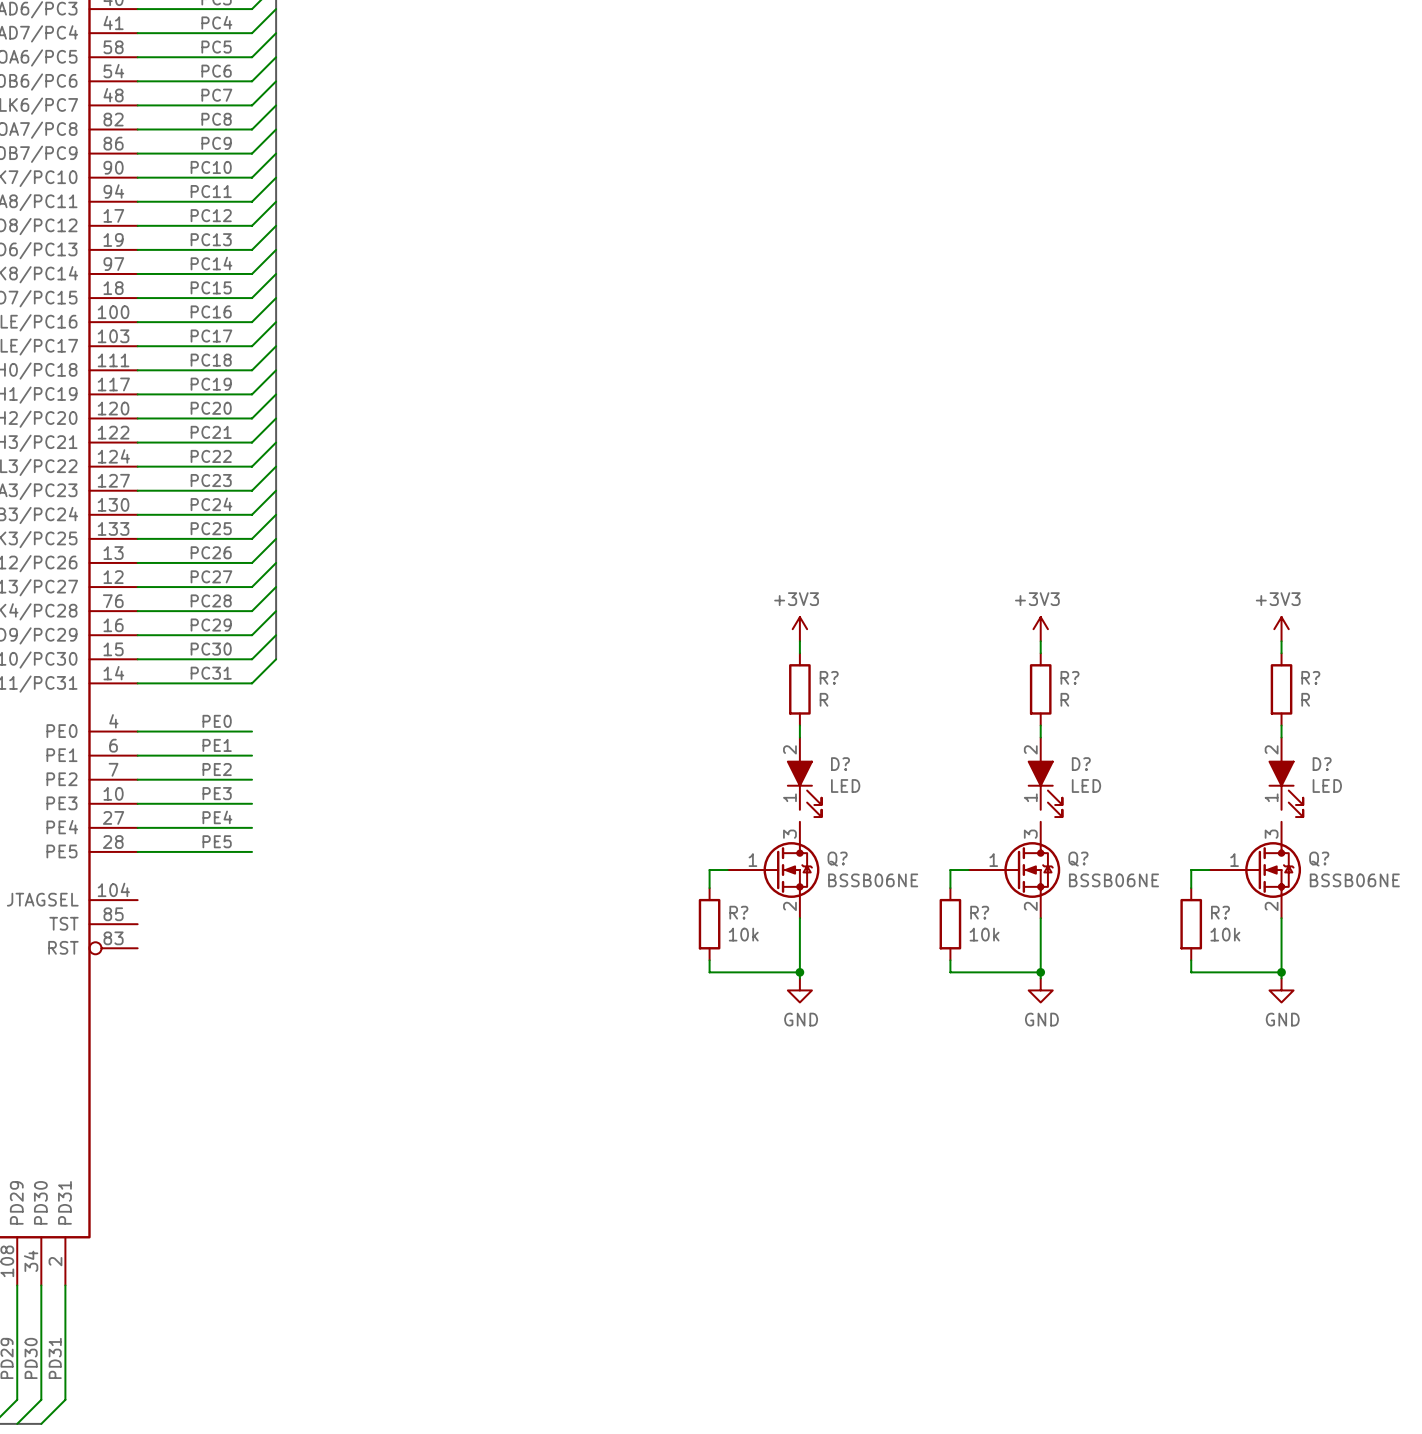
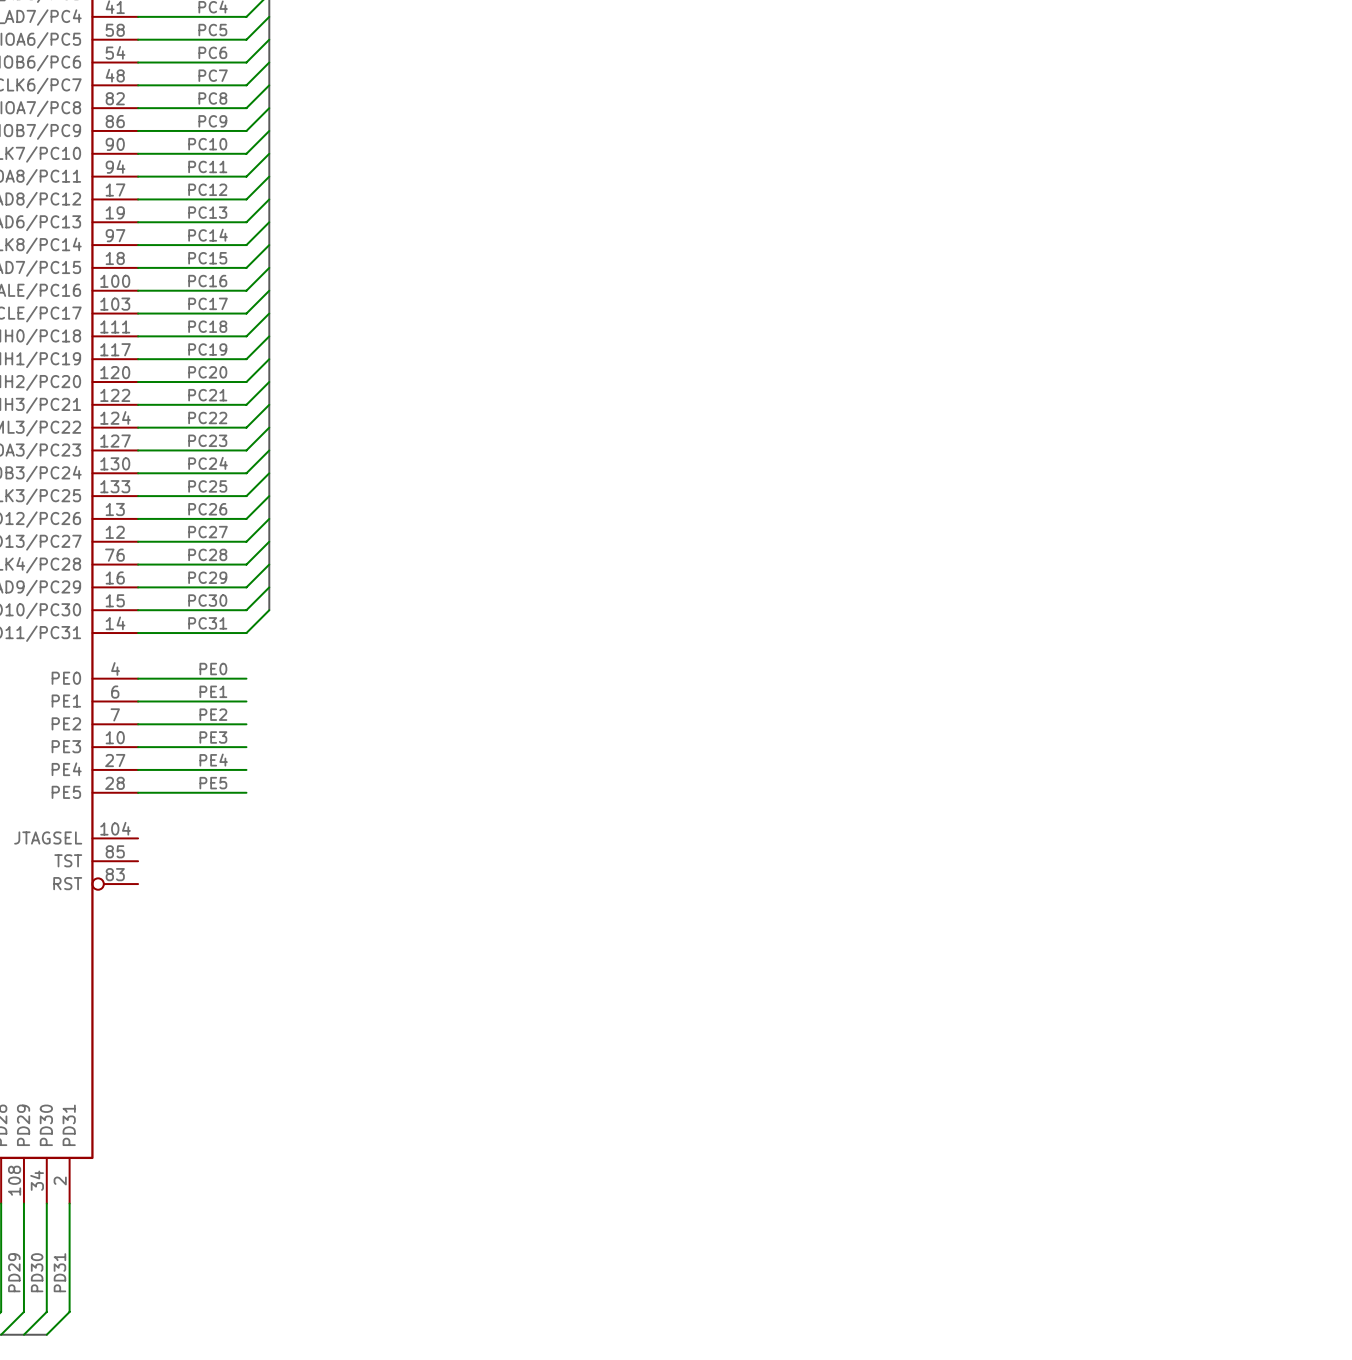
power symbol: +3V3 (799, 629) -> none
power symbol: +3V3 (1040, 629) -> none
power symbol: +3V3 (1281, 629) -> none
wire: (799, 641) (799, 653) -> none
wire: (1040, 641) (1040, 653) -> none
wire: (1281, 641) (1281, 653) -> none
R?: R (799, 689) -> none
R?: R (1040, 689) -> none
R?: R (1281, 689) -> none
wire: (799, 725) (799, 737) -> none
wire: (1040, 725) (1040, 737) -> none
wire: (1281, 725) (1281, 737) -> none
D?: LED (804, 777) -> none
D?: LED (1045, 777) -> none
D?: LED (1285, 777) -> none
wire: (727, 870) (709, 870) (709, 888) -> none
Q?: BSSB06NE (773, 870) -> none
wire: (968, 870) (950, 870) (950, 888) -> none
Q?: BSSB06NE (1014, 870) -> none
wire: (1209, 870) (1191, 870) (1191, 888) -> none
Q?: BSSB06NE (1255, 870) -> none
wire: (799, 918) (799, 978) -> none
wire: (1040, 918) (1040, 978) -> none
wire: (1281, 918) (1281, 978) -> none
R?: 10k (709, 924) -> none
R?: 10k (950, 924) -> none
R?: 10k (1191, 924) -> none
wire: (709, 960) (709, 972) (799, 972) -> none
wire: (950, 960) (950, 972) (1040, 972) -> none
wire: (1191, 960) (1191, 972) (1281, 972) -> none
junction: (799, 972) -> none
junction: (1040, 972) -> none
junction: (1281, 972) -> none
power symbol: GND (799, 990) -> none
power symbol: GND (1040, 990) -> none
power symbol: GND (1281, 990) -> none

